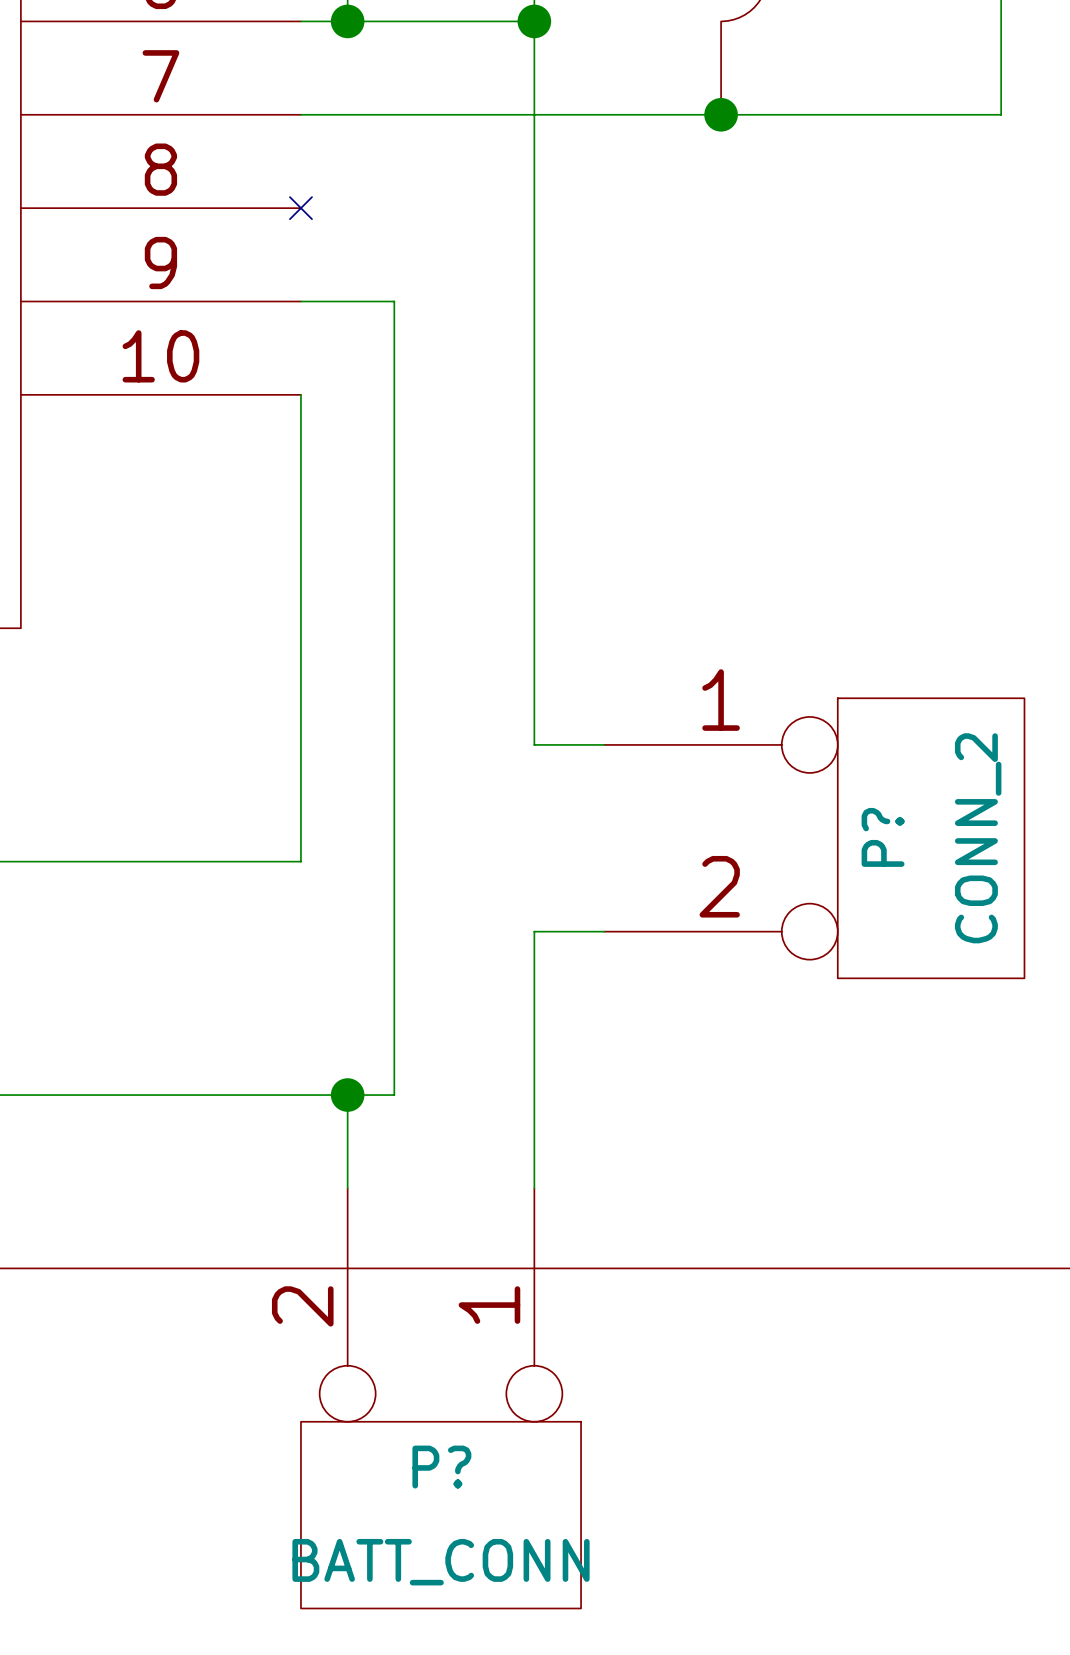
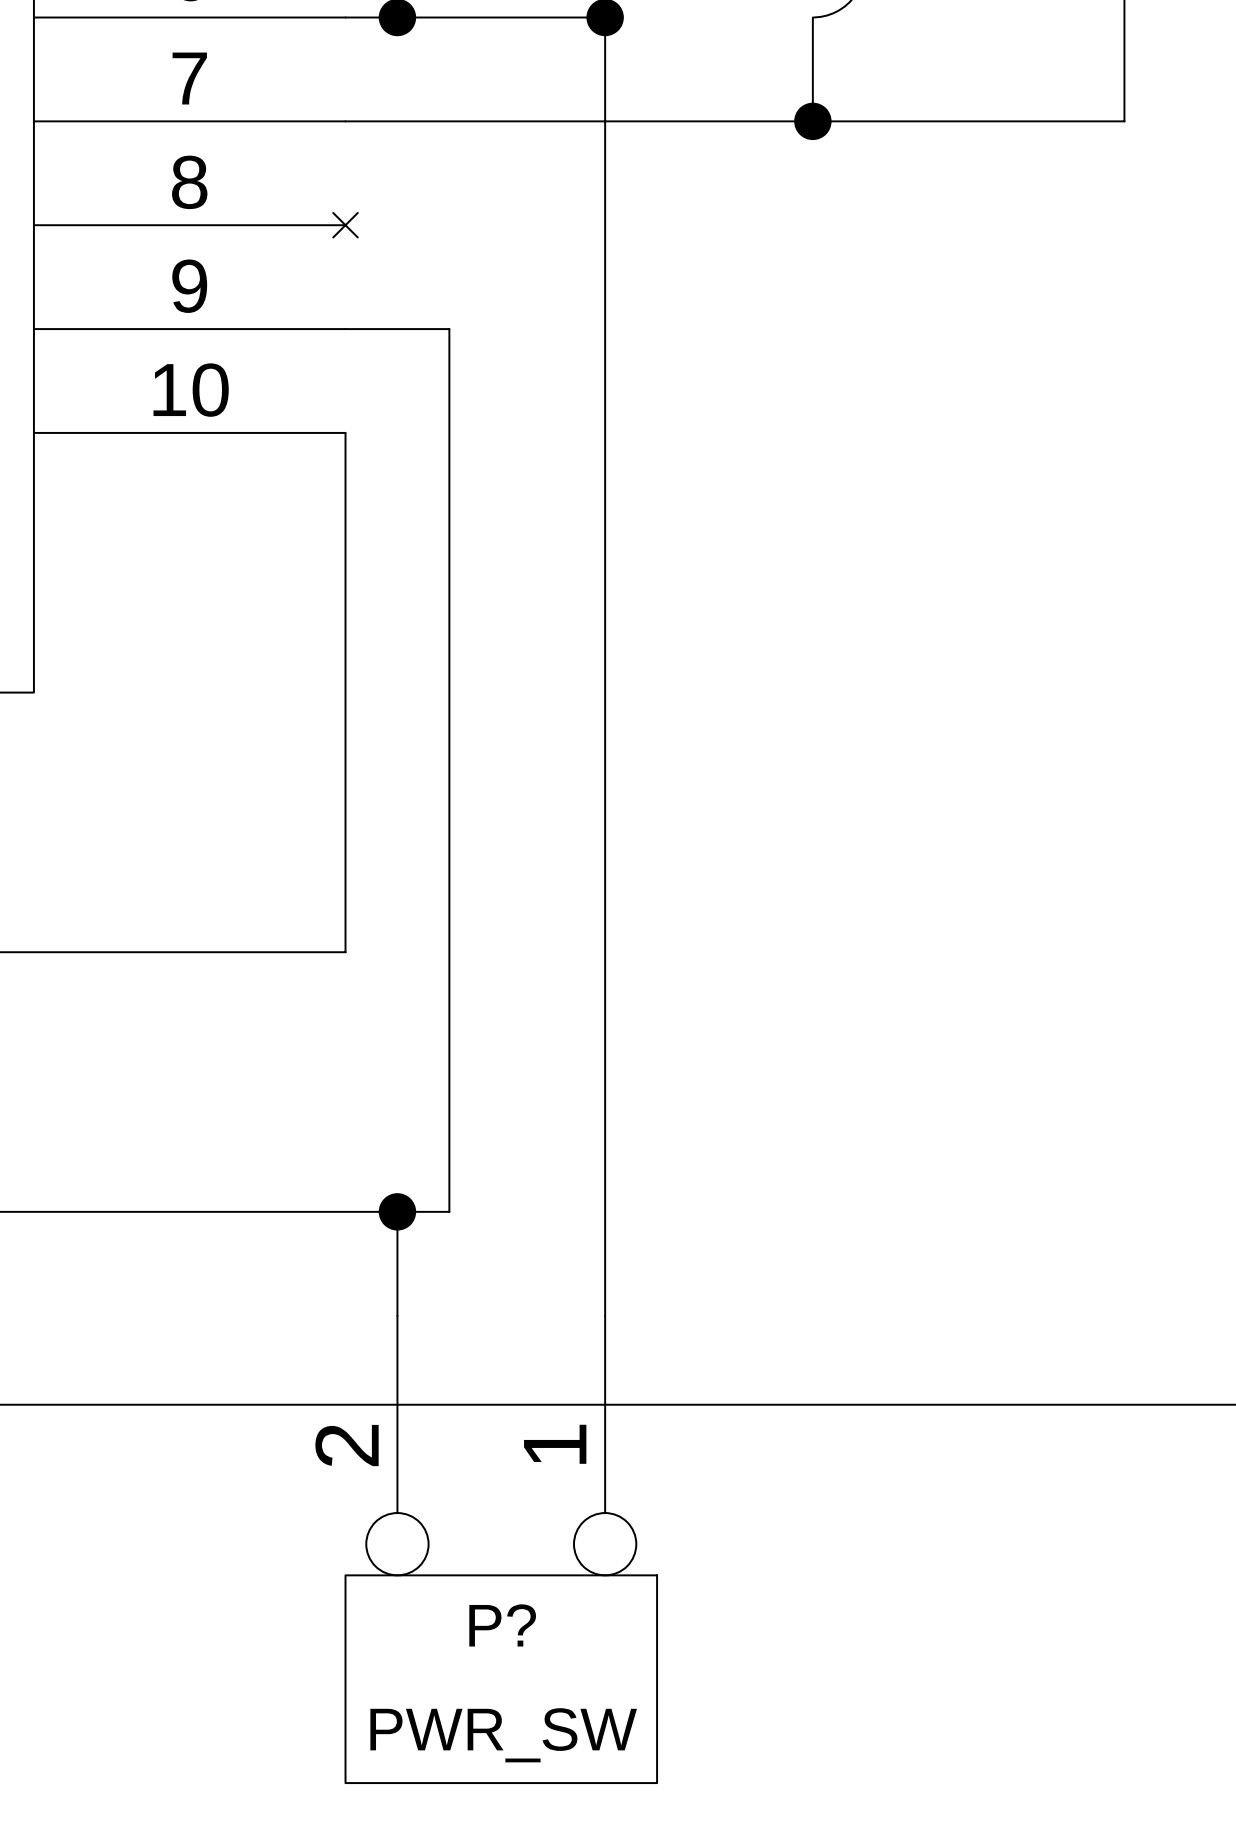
wire: (534, 744) (604, 744) -> (605, 822) (605, 1030)
P?: CONN_2 (814, 838) -> none
wire: (534, 931) (604, 931) -> none
P? value: BATT_CONN (441, 1562) -> PWR_SW (503, 1735)

